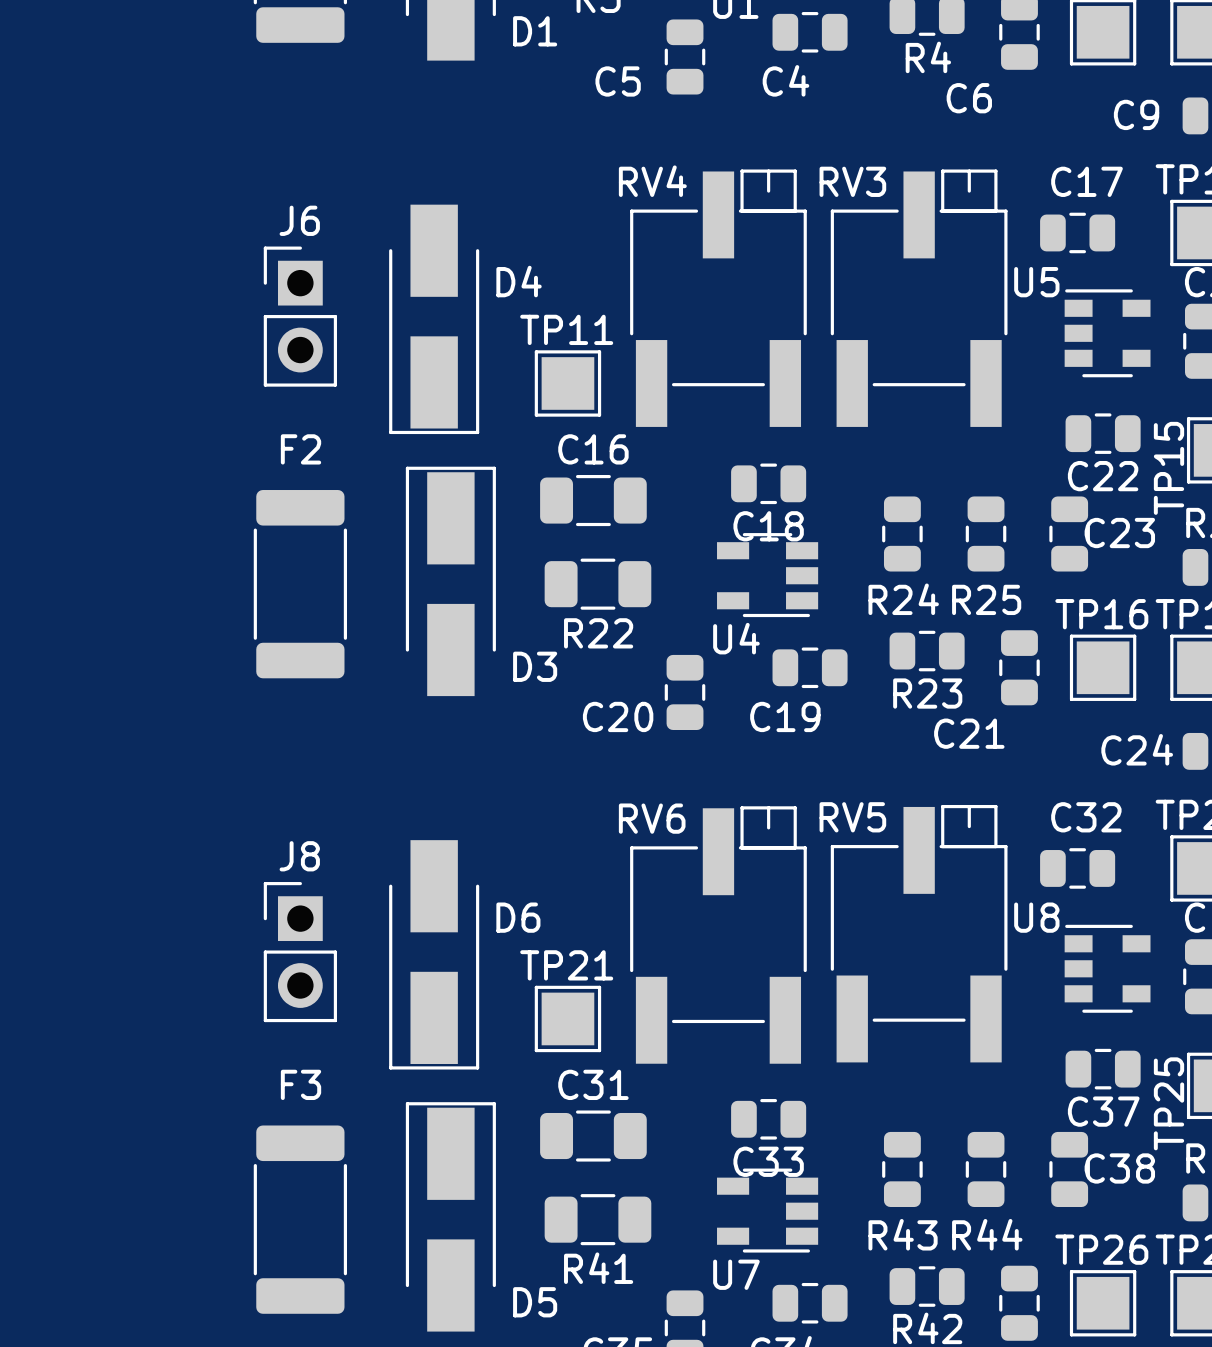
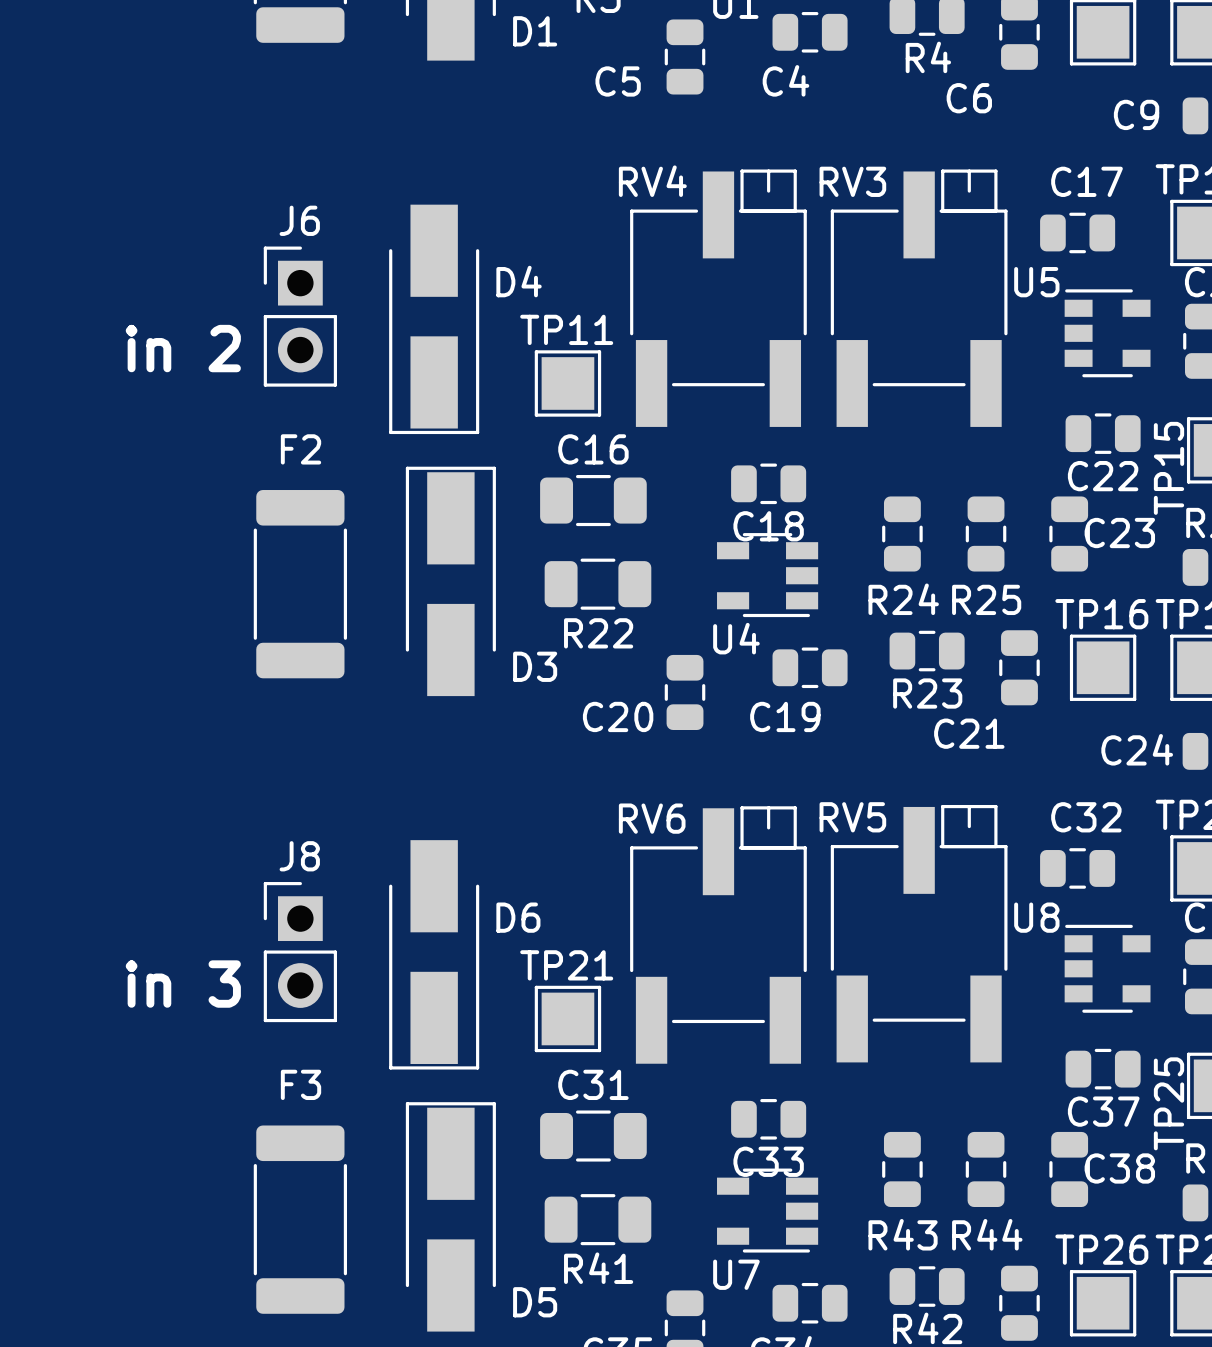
text: none -> in 2 (183, 348)
text: none -> in 3 (183, 984)

